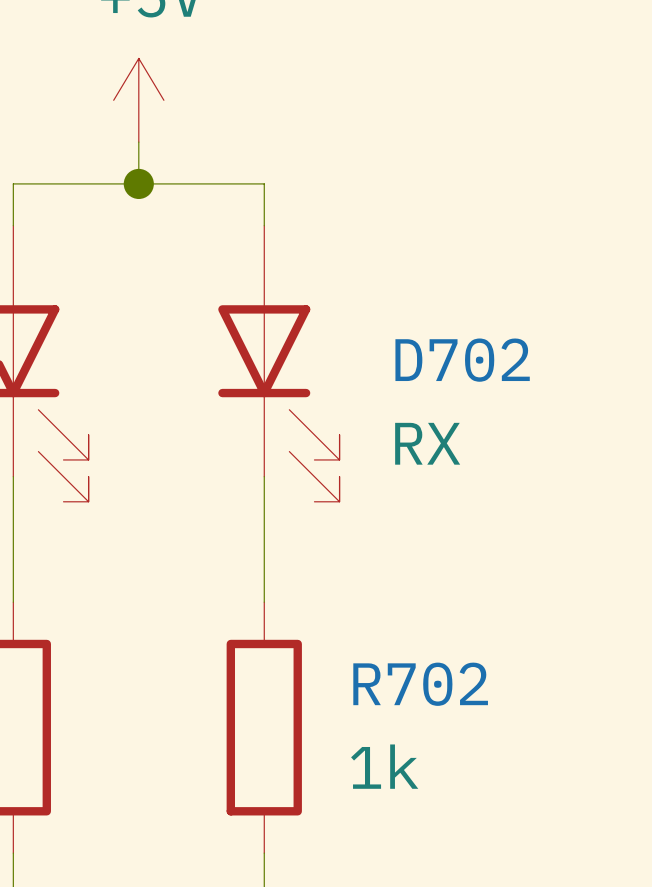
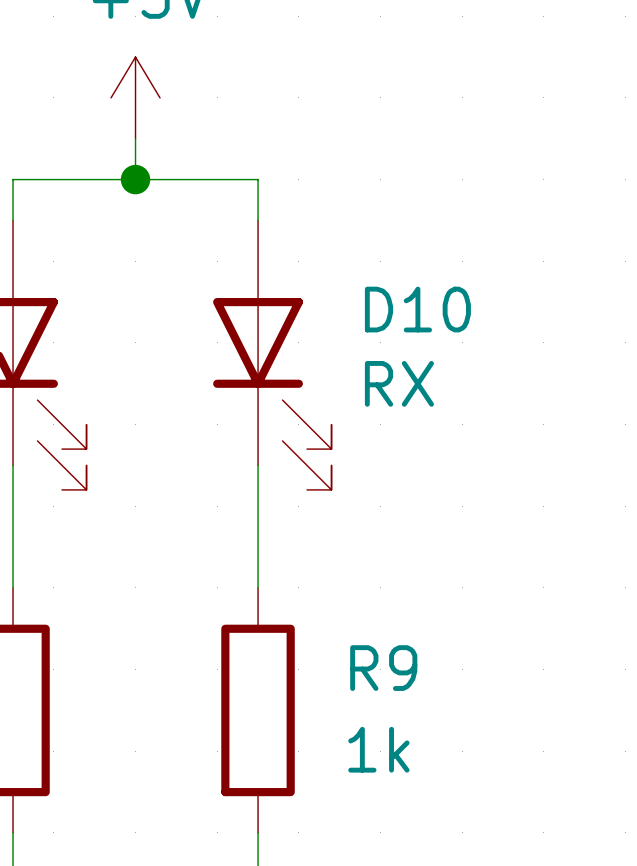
D702 name: D702 (462, 360) -> D10 (417, 309)
D702 value position: RX (427, 443) -> RX (399, 383)
R702 name: R702 (420, 684) -> R9 (383, 668)

